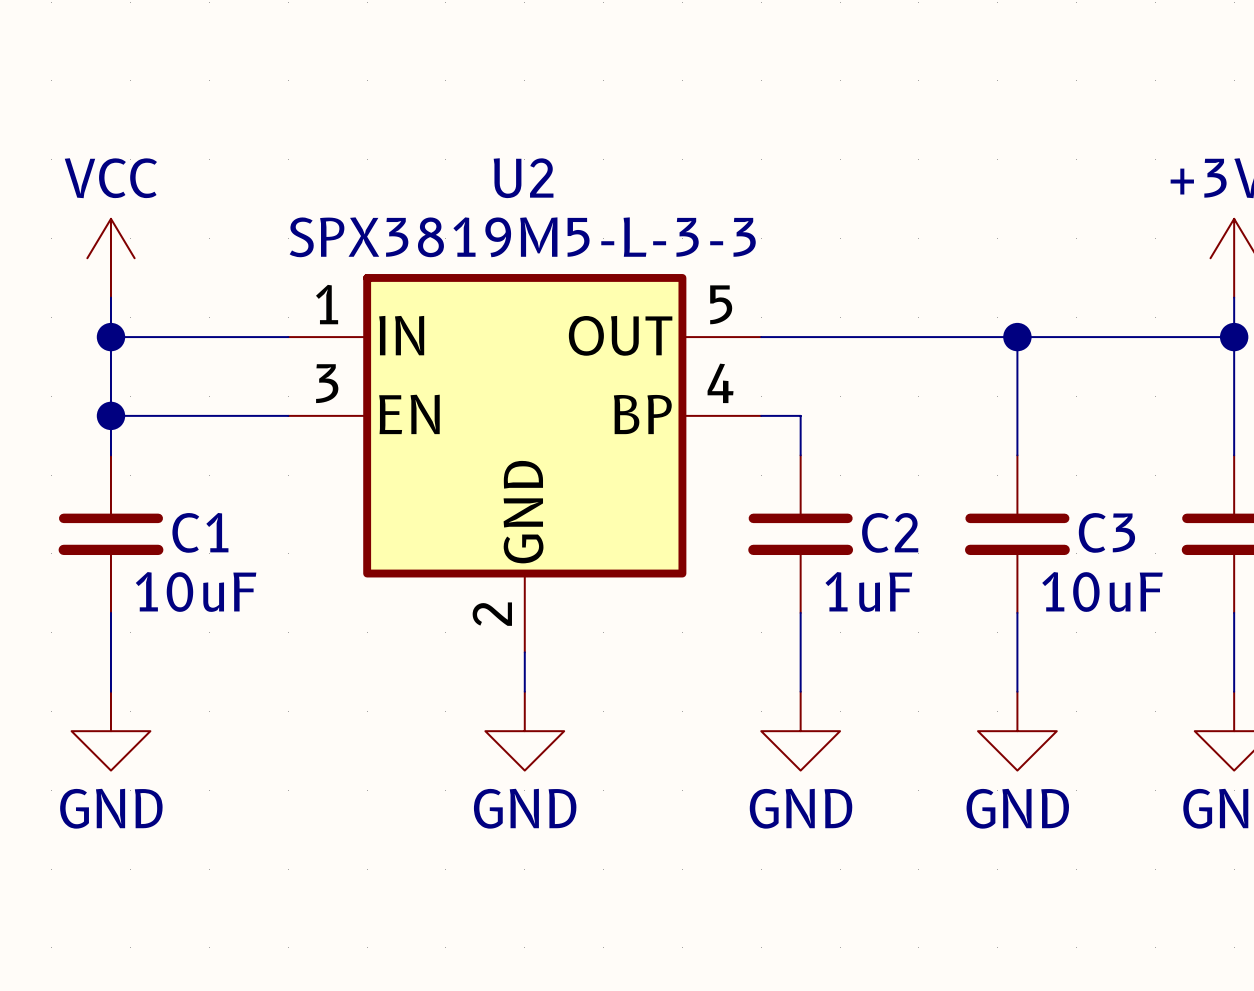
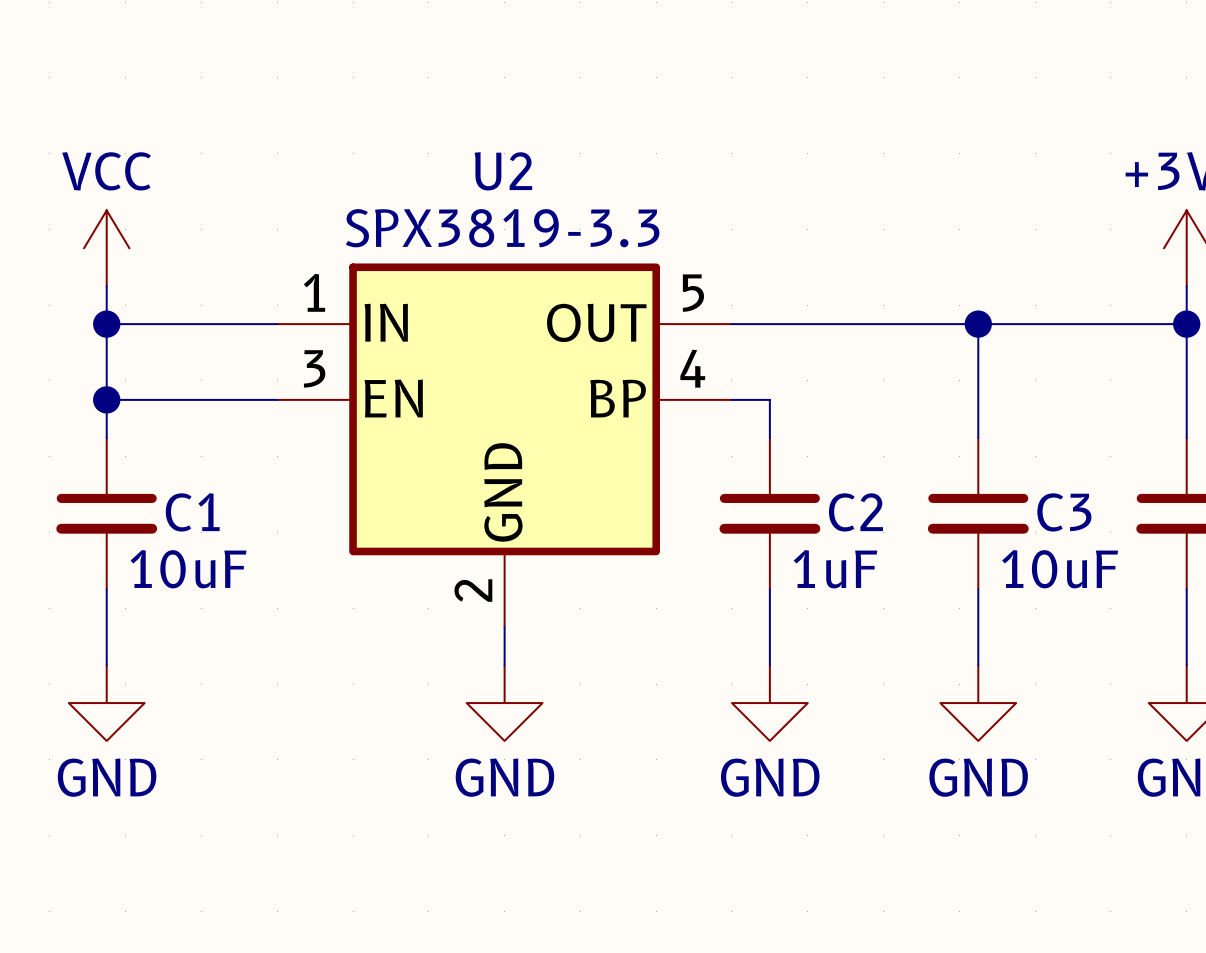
U2 value: SPX3819M5-L-3-3 (522, 237) -> SPX3819-3.3 (502, 228)

